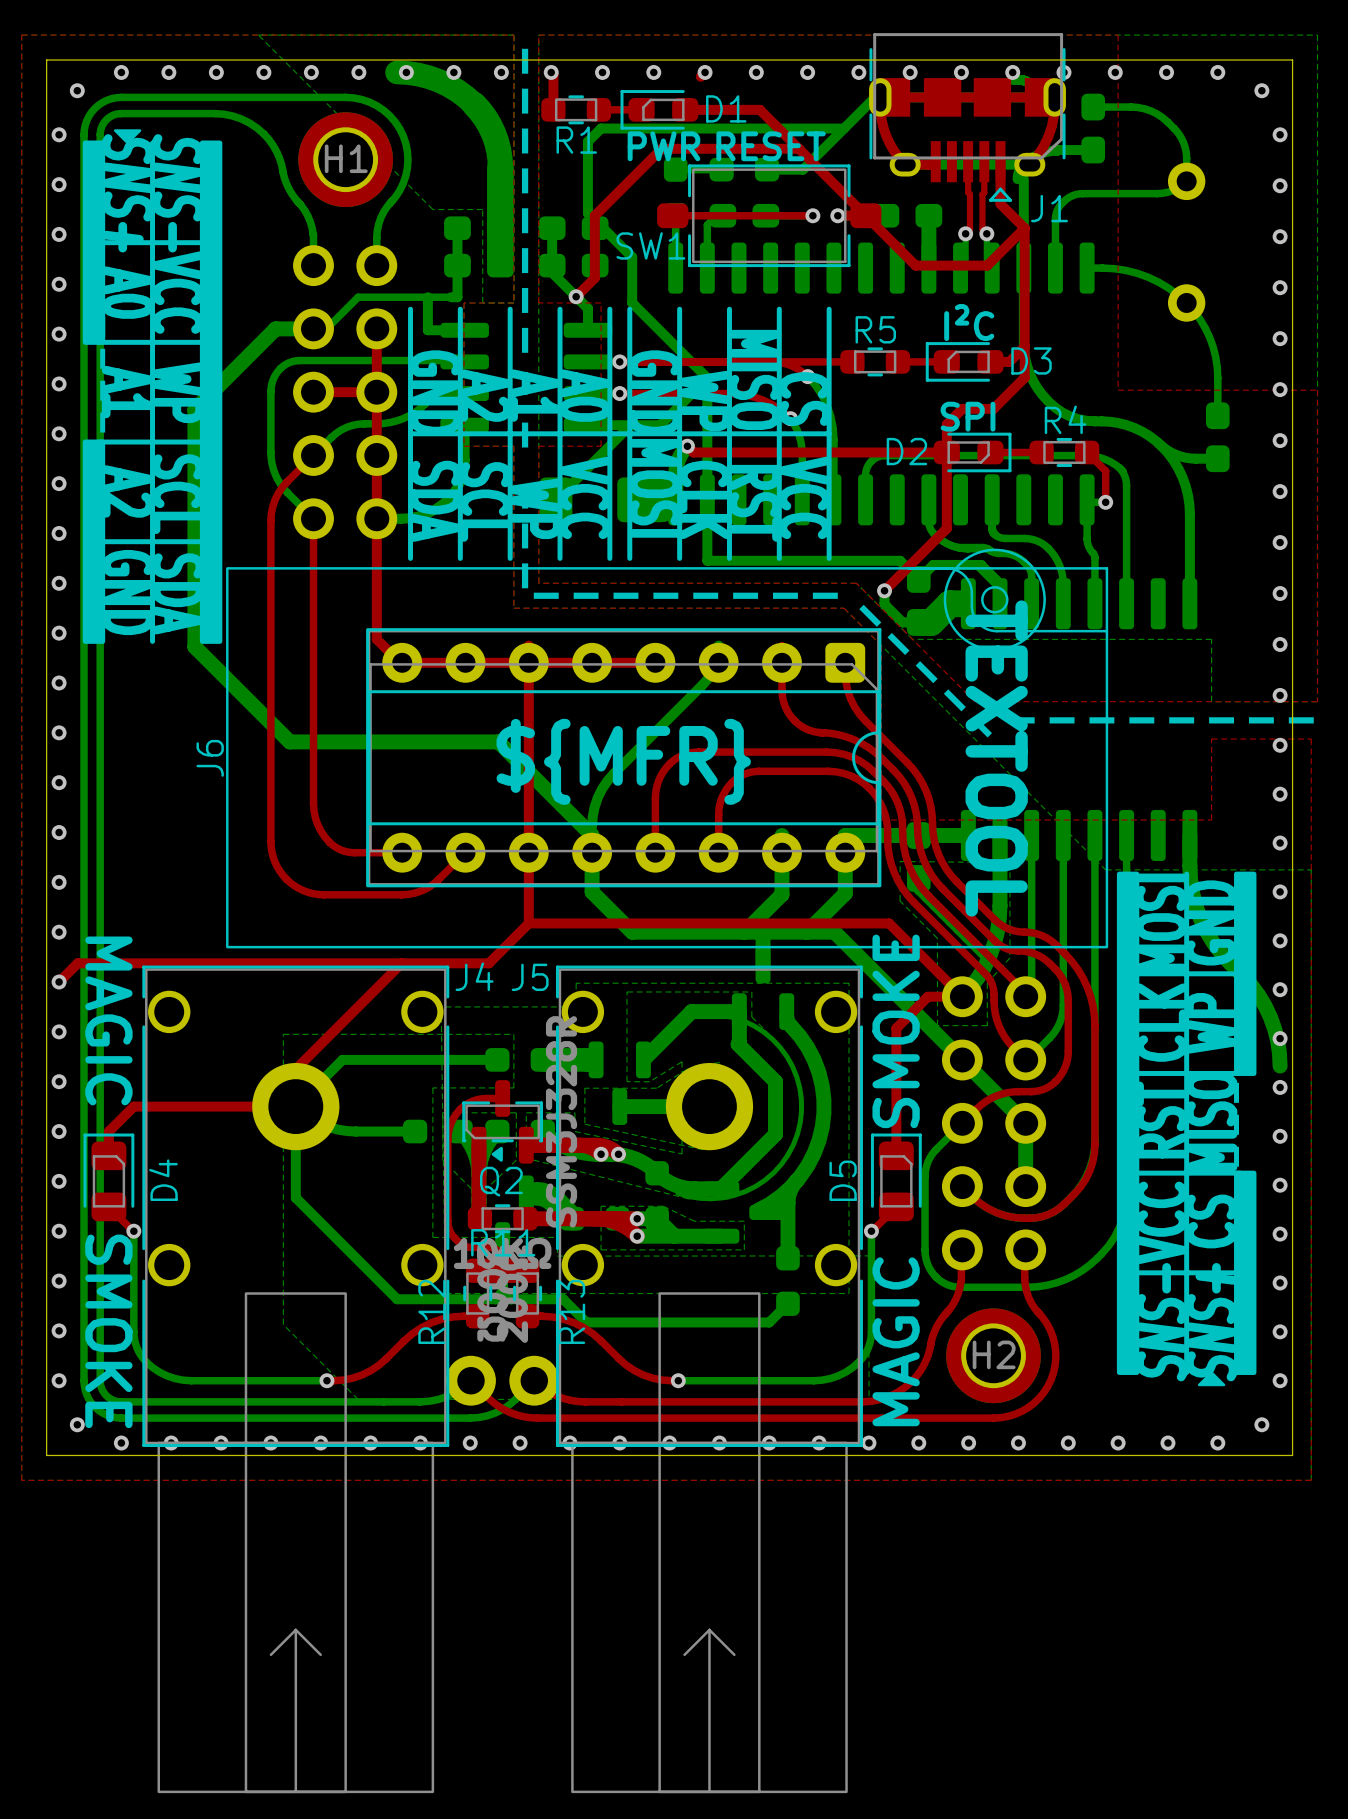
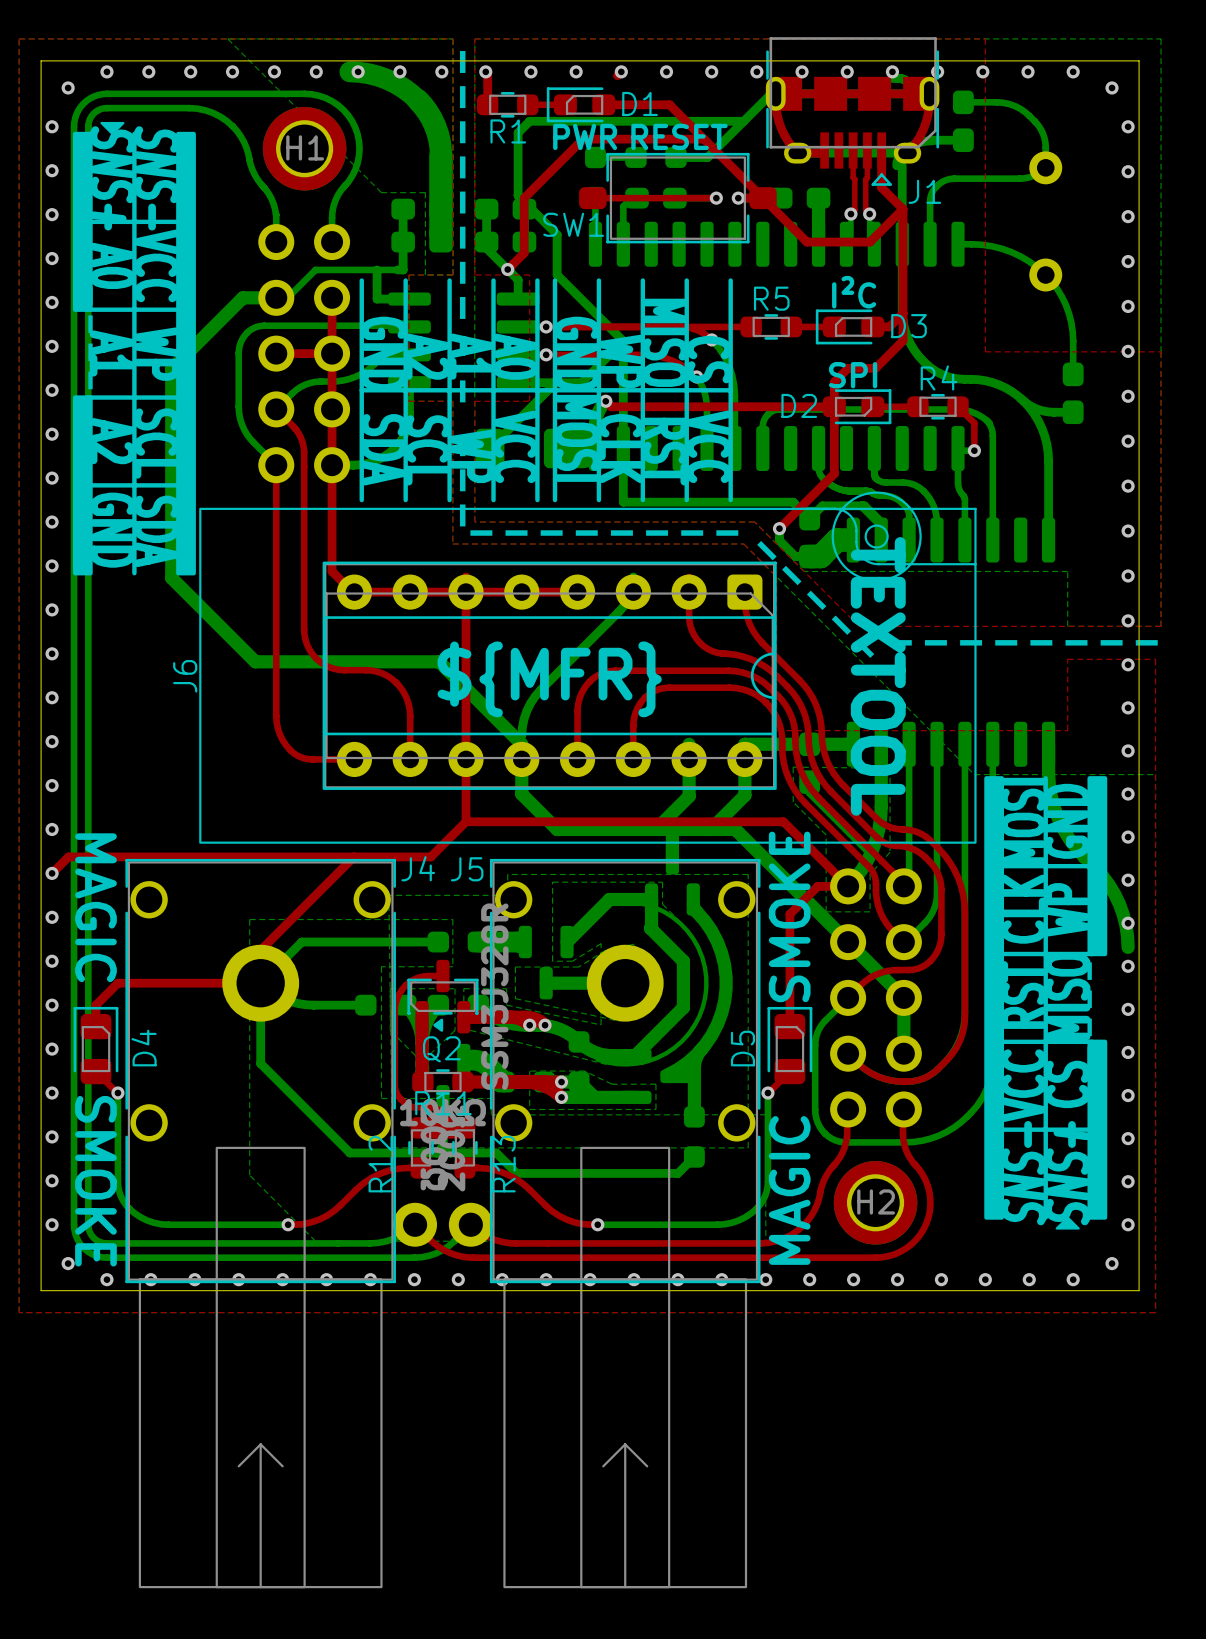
top track: (313, 455) (282, 487) (275, 499) (271, 513) (270, 841) (274, 861) (279, 871) (290, 882) (308, 892) (324, 894) (401, 894) (415, 893) (427, 887) (465, 852) -> (276, 409) (296, 429) (303, 448) (304, 629) (307, 645) (316, 658) (329, 667) (339, 669) (378, 672) (389, 677) (399, 686) (406, 698) (410, 711) (410, 759)

